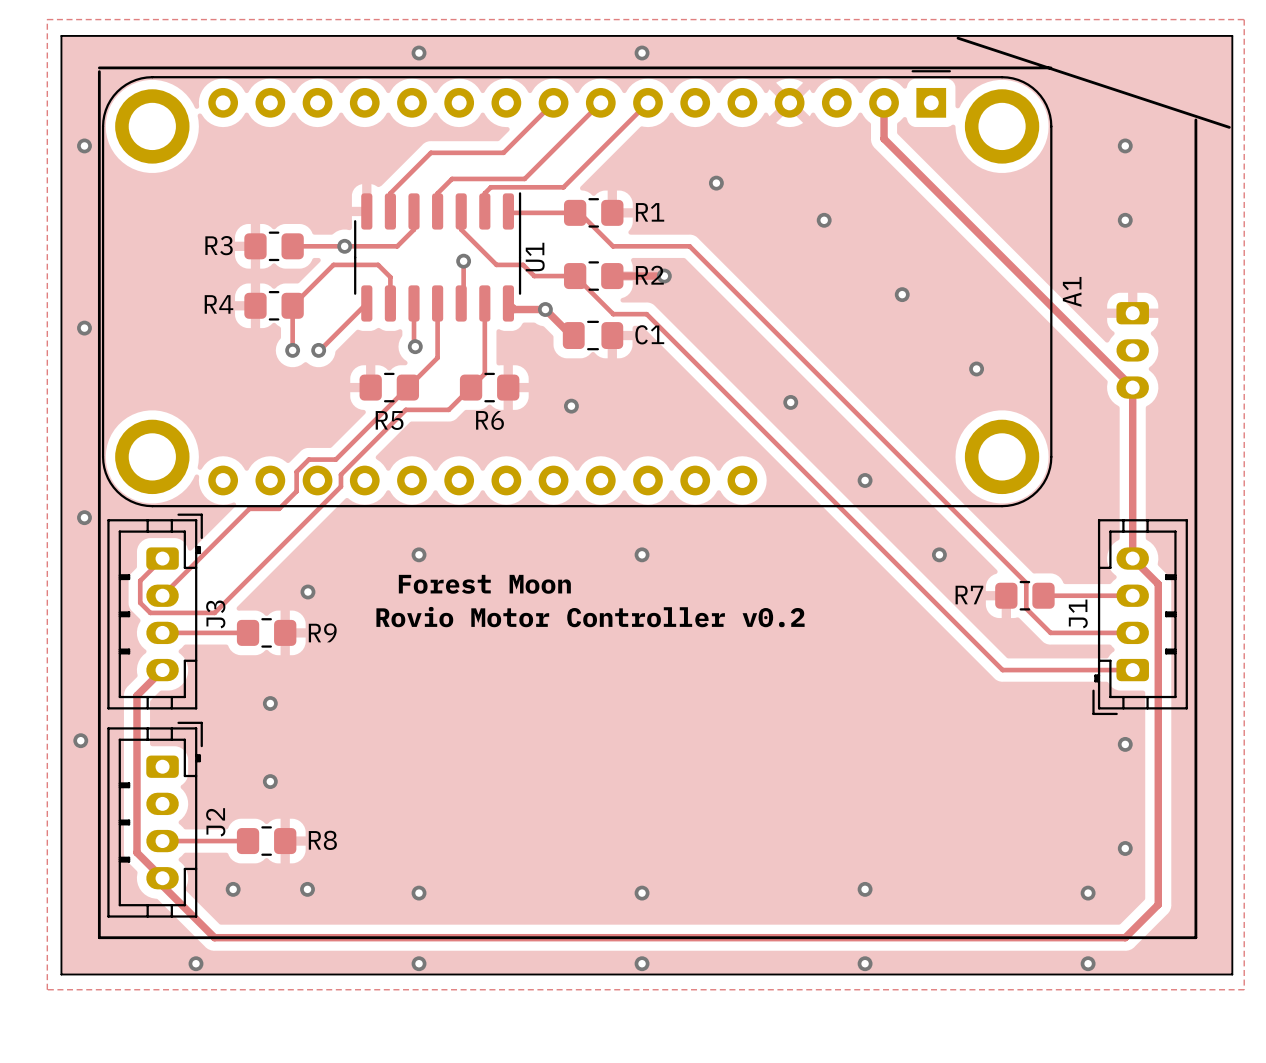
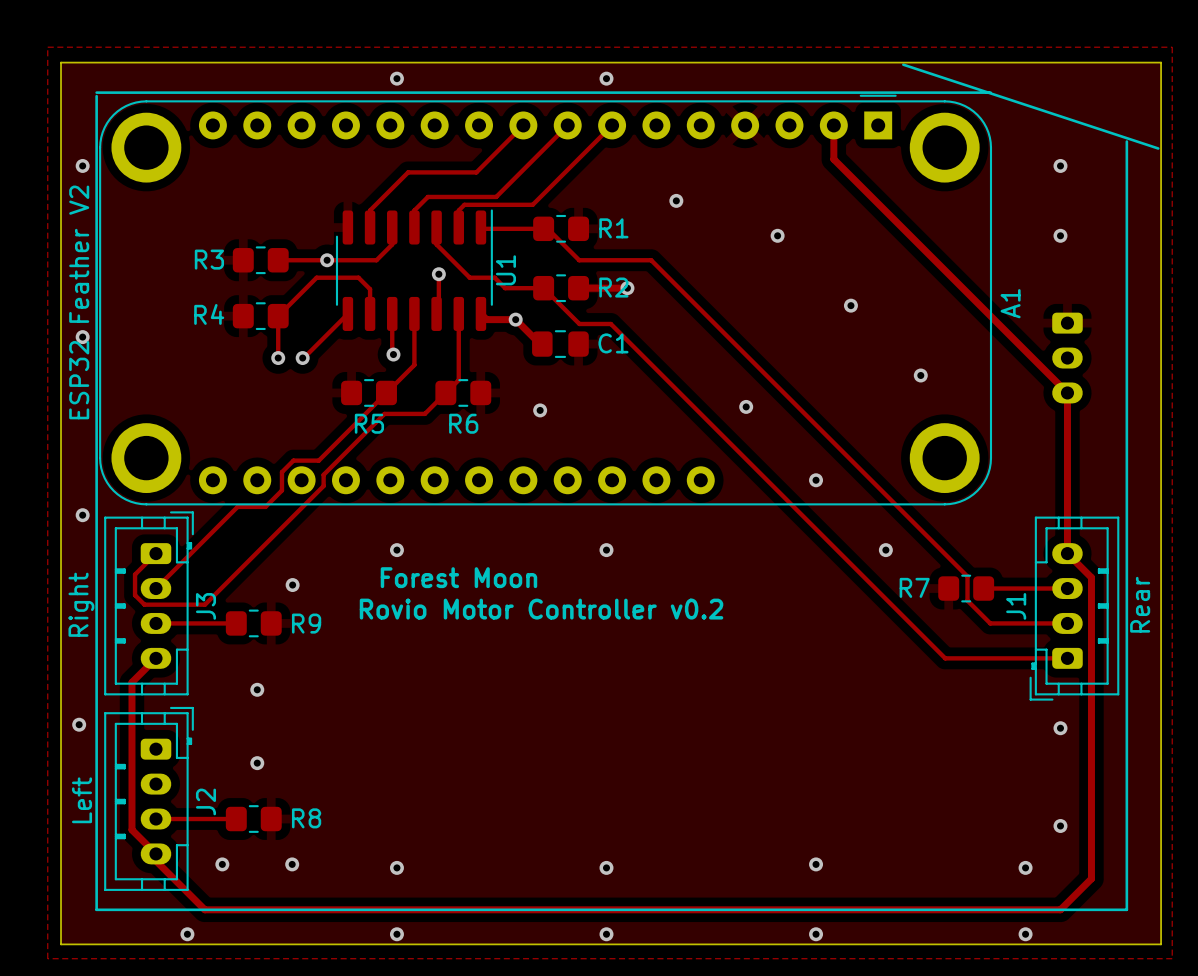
A1 value: none -> ESP32 Feather V2 (79, 302)
J1 value: none -> Rear (1140, 604)
J3 value: none -> Right (81, 604)
J2 value: none -> Left (82, 800)

